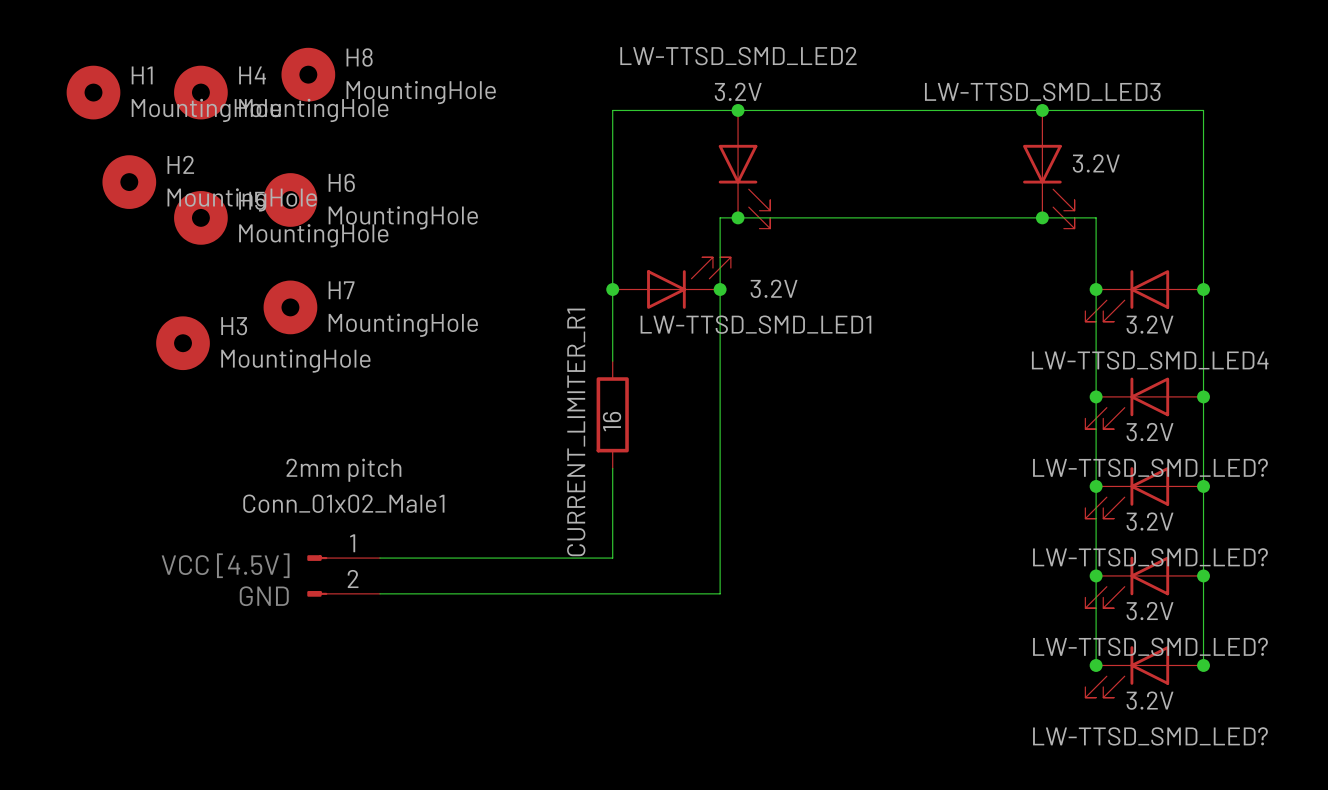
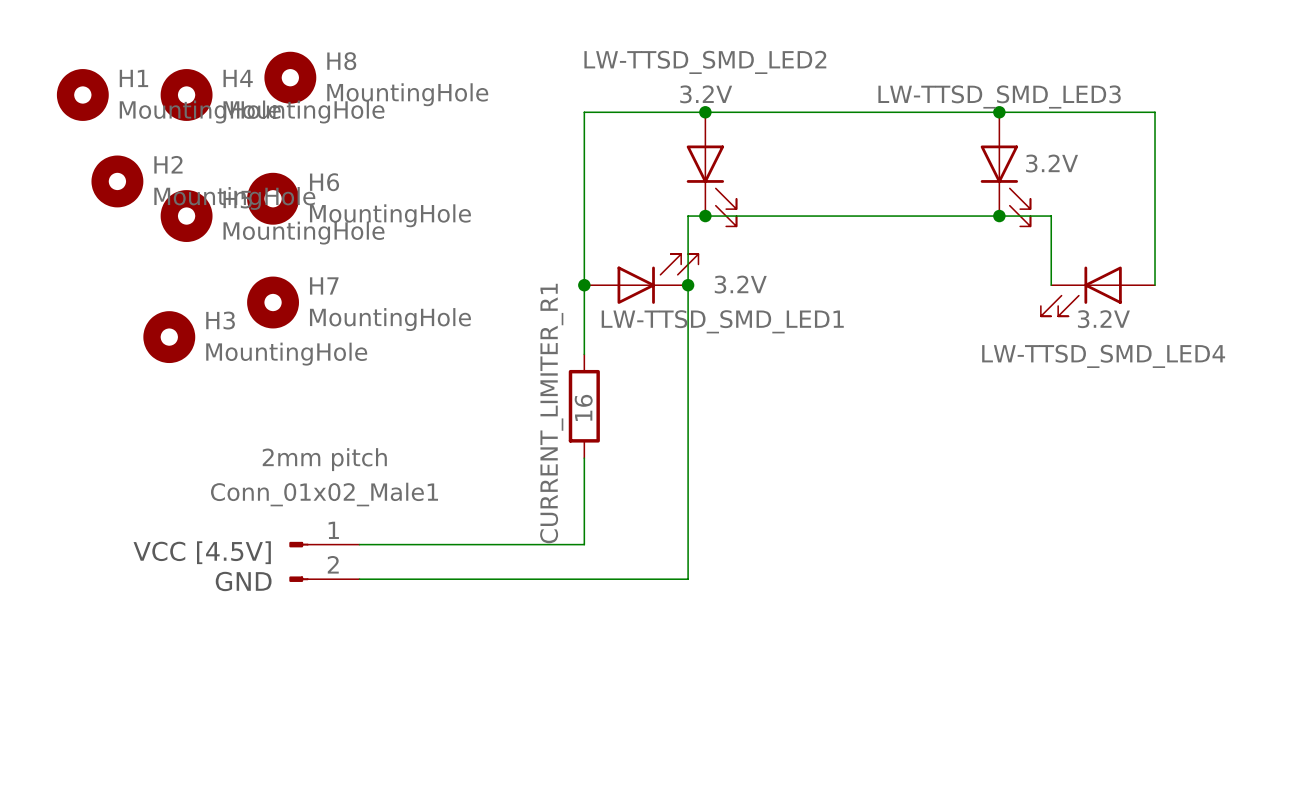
wire: (1096, 289) (1096, 665) -> none
junction: (1096, 289) -> none
wire: (1203, 289) (1203, 665) -> none
junction: (1203, 289) -> none
junction: (1096, 396) -> none
junction: (1203, 396) -> none
LW-TTSD_SMD_LED?: 3.2V (1144, 403) -> none
junction: (1096, 486) -> none
junction: (1203, 486) -> none
LW-TTSD_SMD_LED?: 3.2V (1144, 492) -> none
junction: (1096, 575) -> none
junction: (1203, 575) -> none
LW-TTSD_SMD_LED?: 3.2V (1144, 582) -> none
junction: (1096, 665) -> none
junction: (1203, 665) -> none
LW-TTSD_SMD_LED?: 3.2V (1144, 671) -> none

